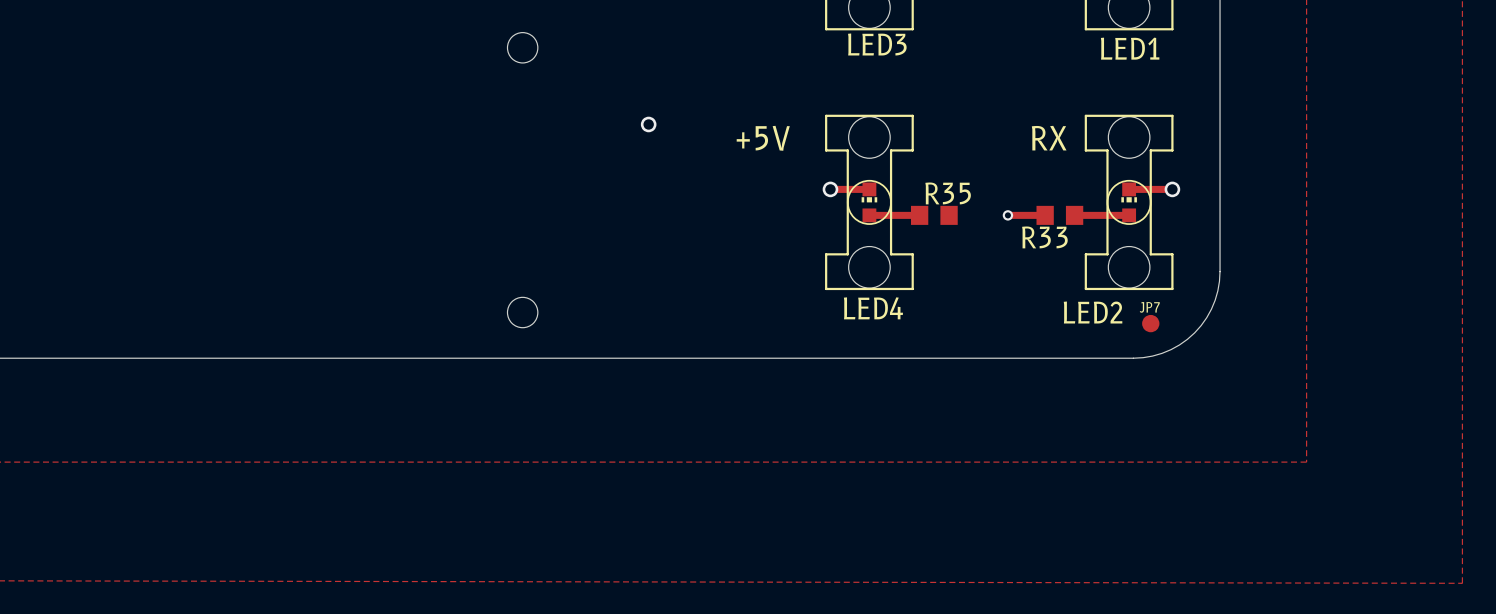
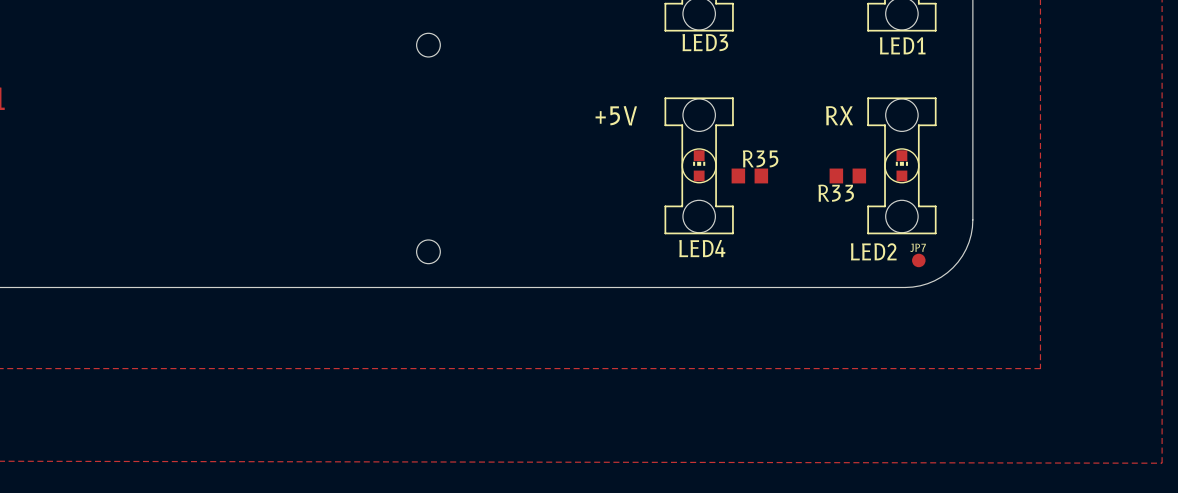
via: (648, 124) -> none
track: (830, 189) (869, 189) -> none
via: (830, 189) -> none
track: (1129, 189) (1172, 189) -> none
via: (1172, 189) -> none
track: (869, 215) (919, 215) -> none
track: (1007, 215) (1045, 215) -> none
via: (1007, 215) -> none
track: (1074, 215) (1129, 215) -> none

